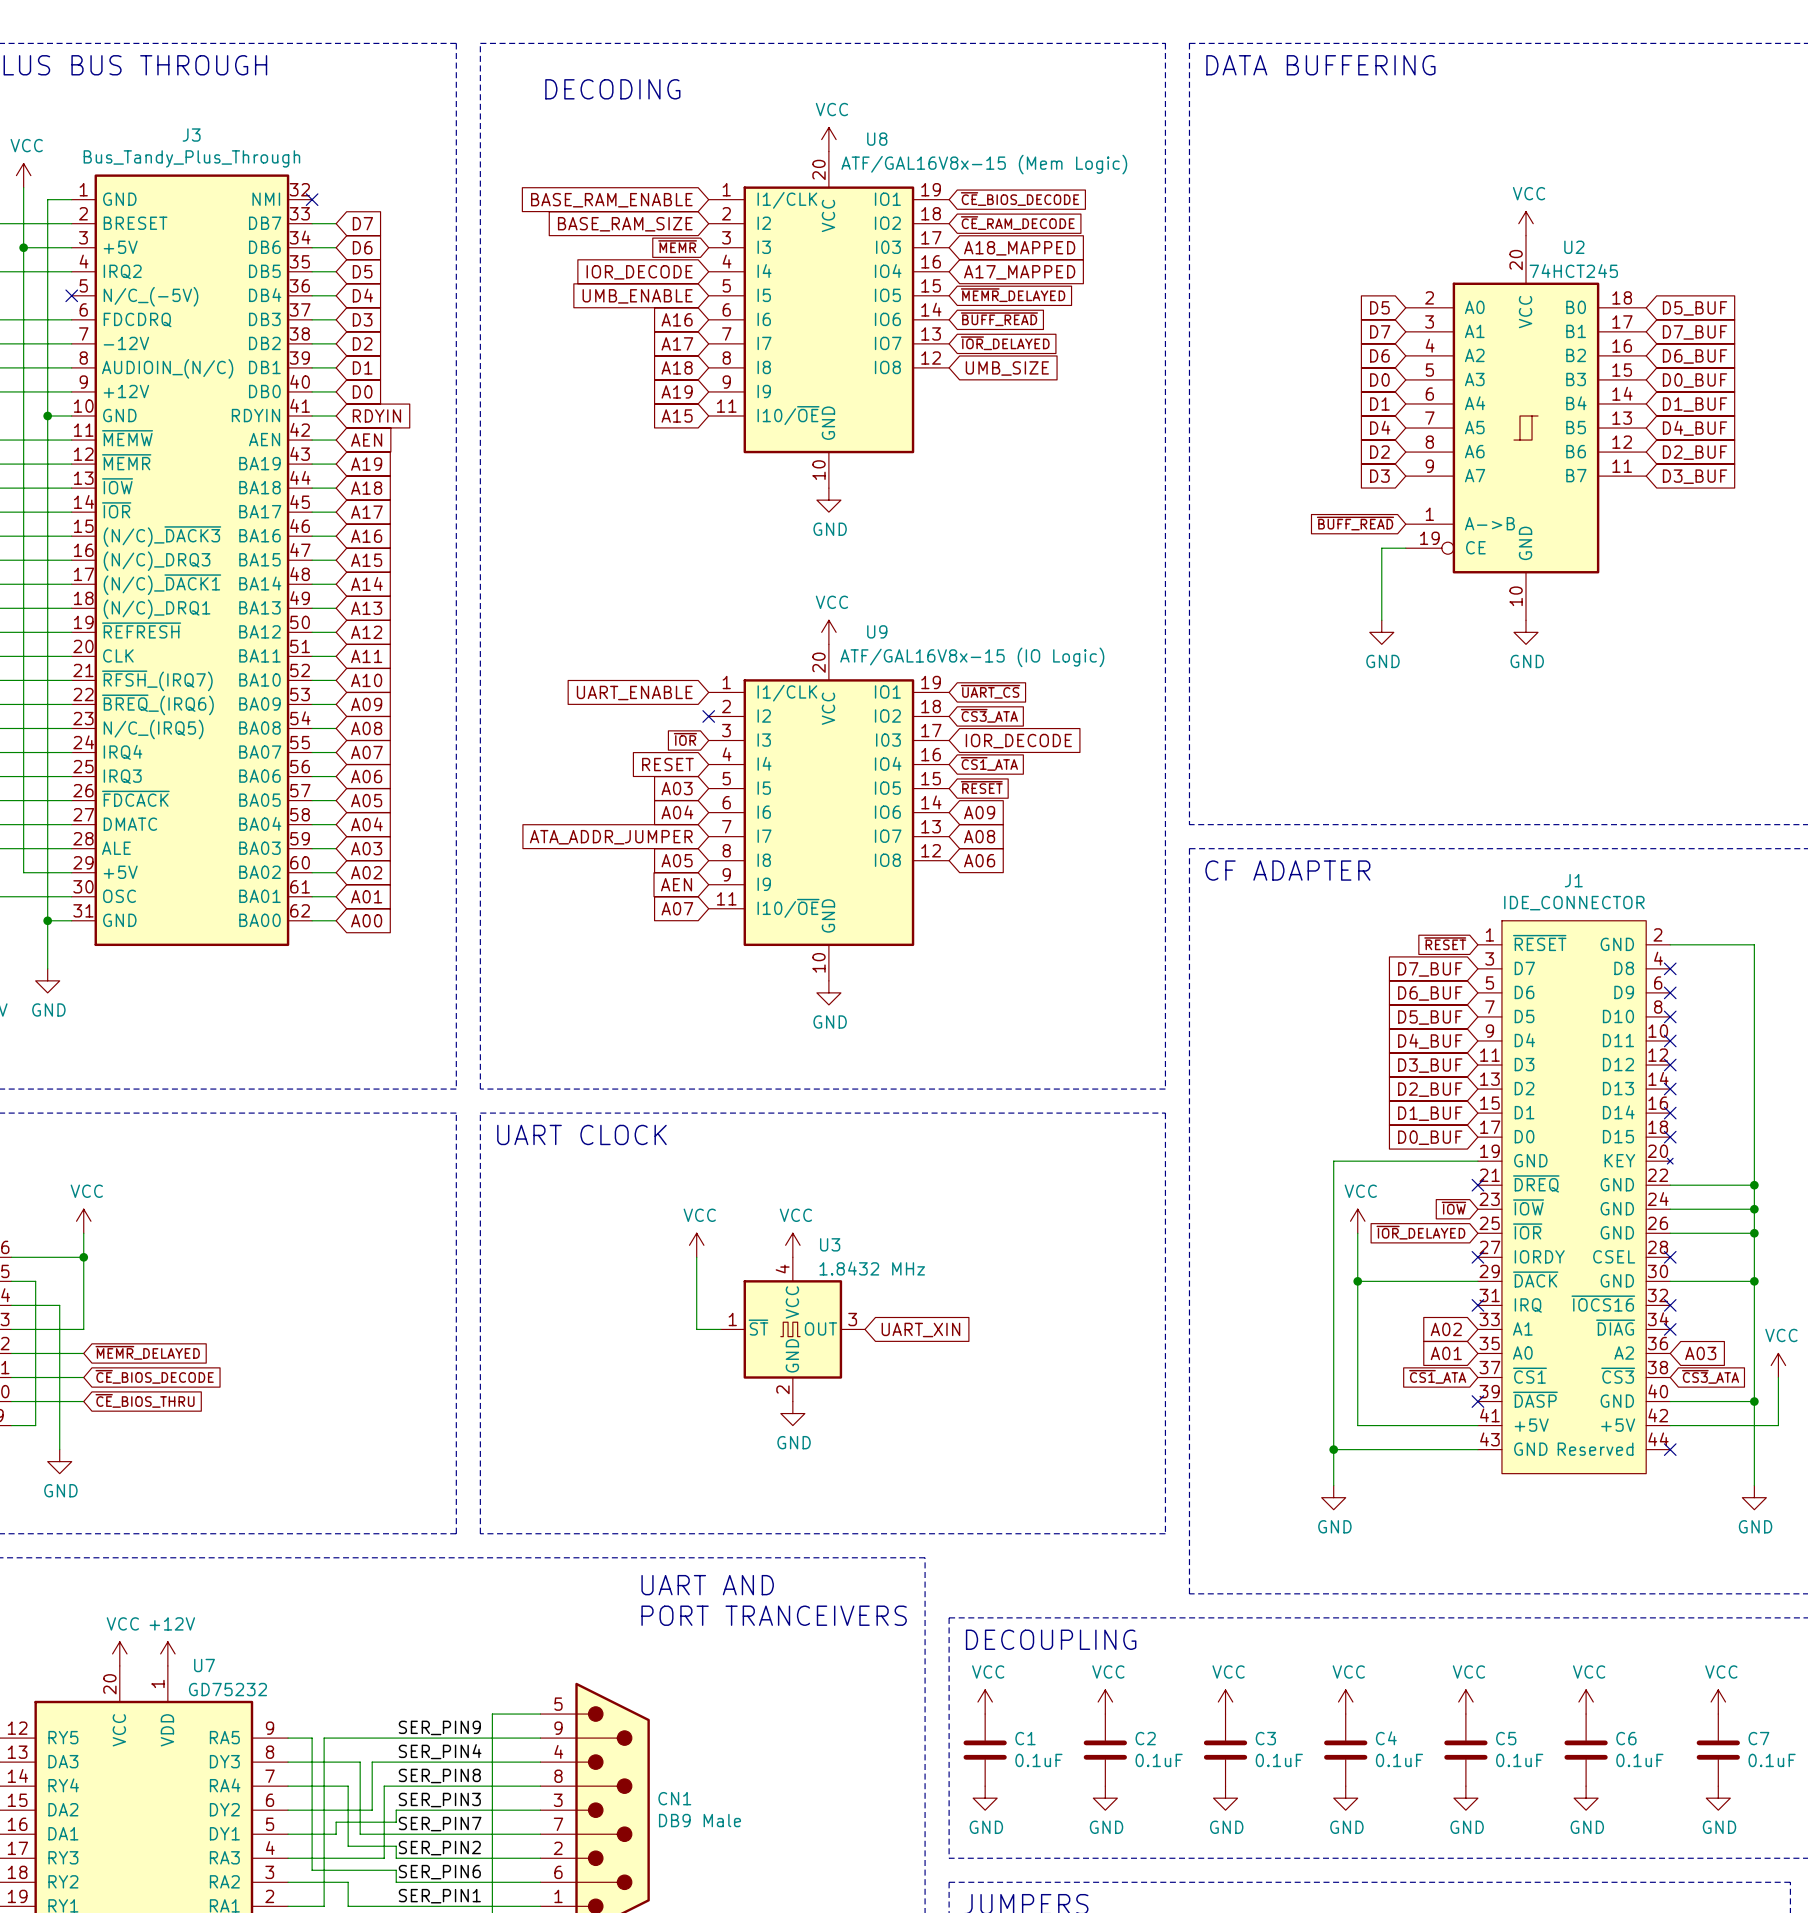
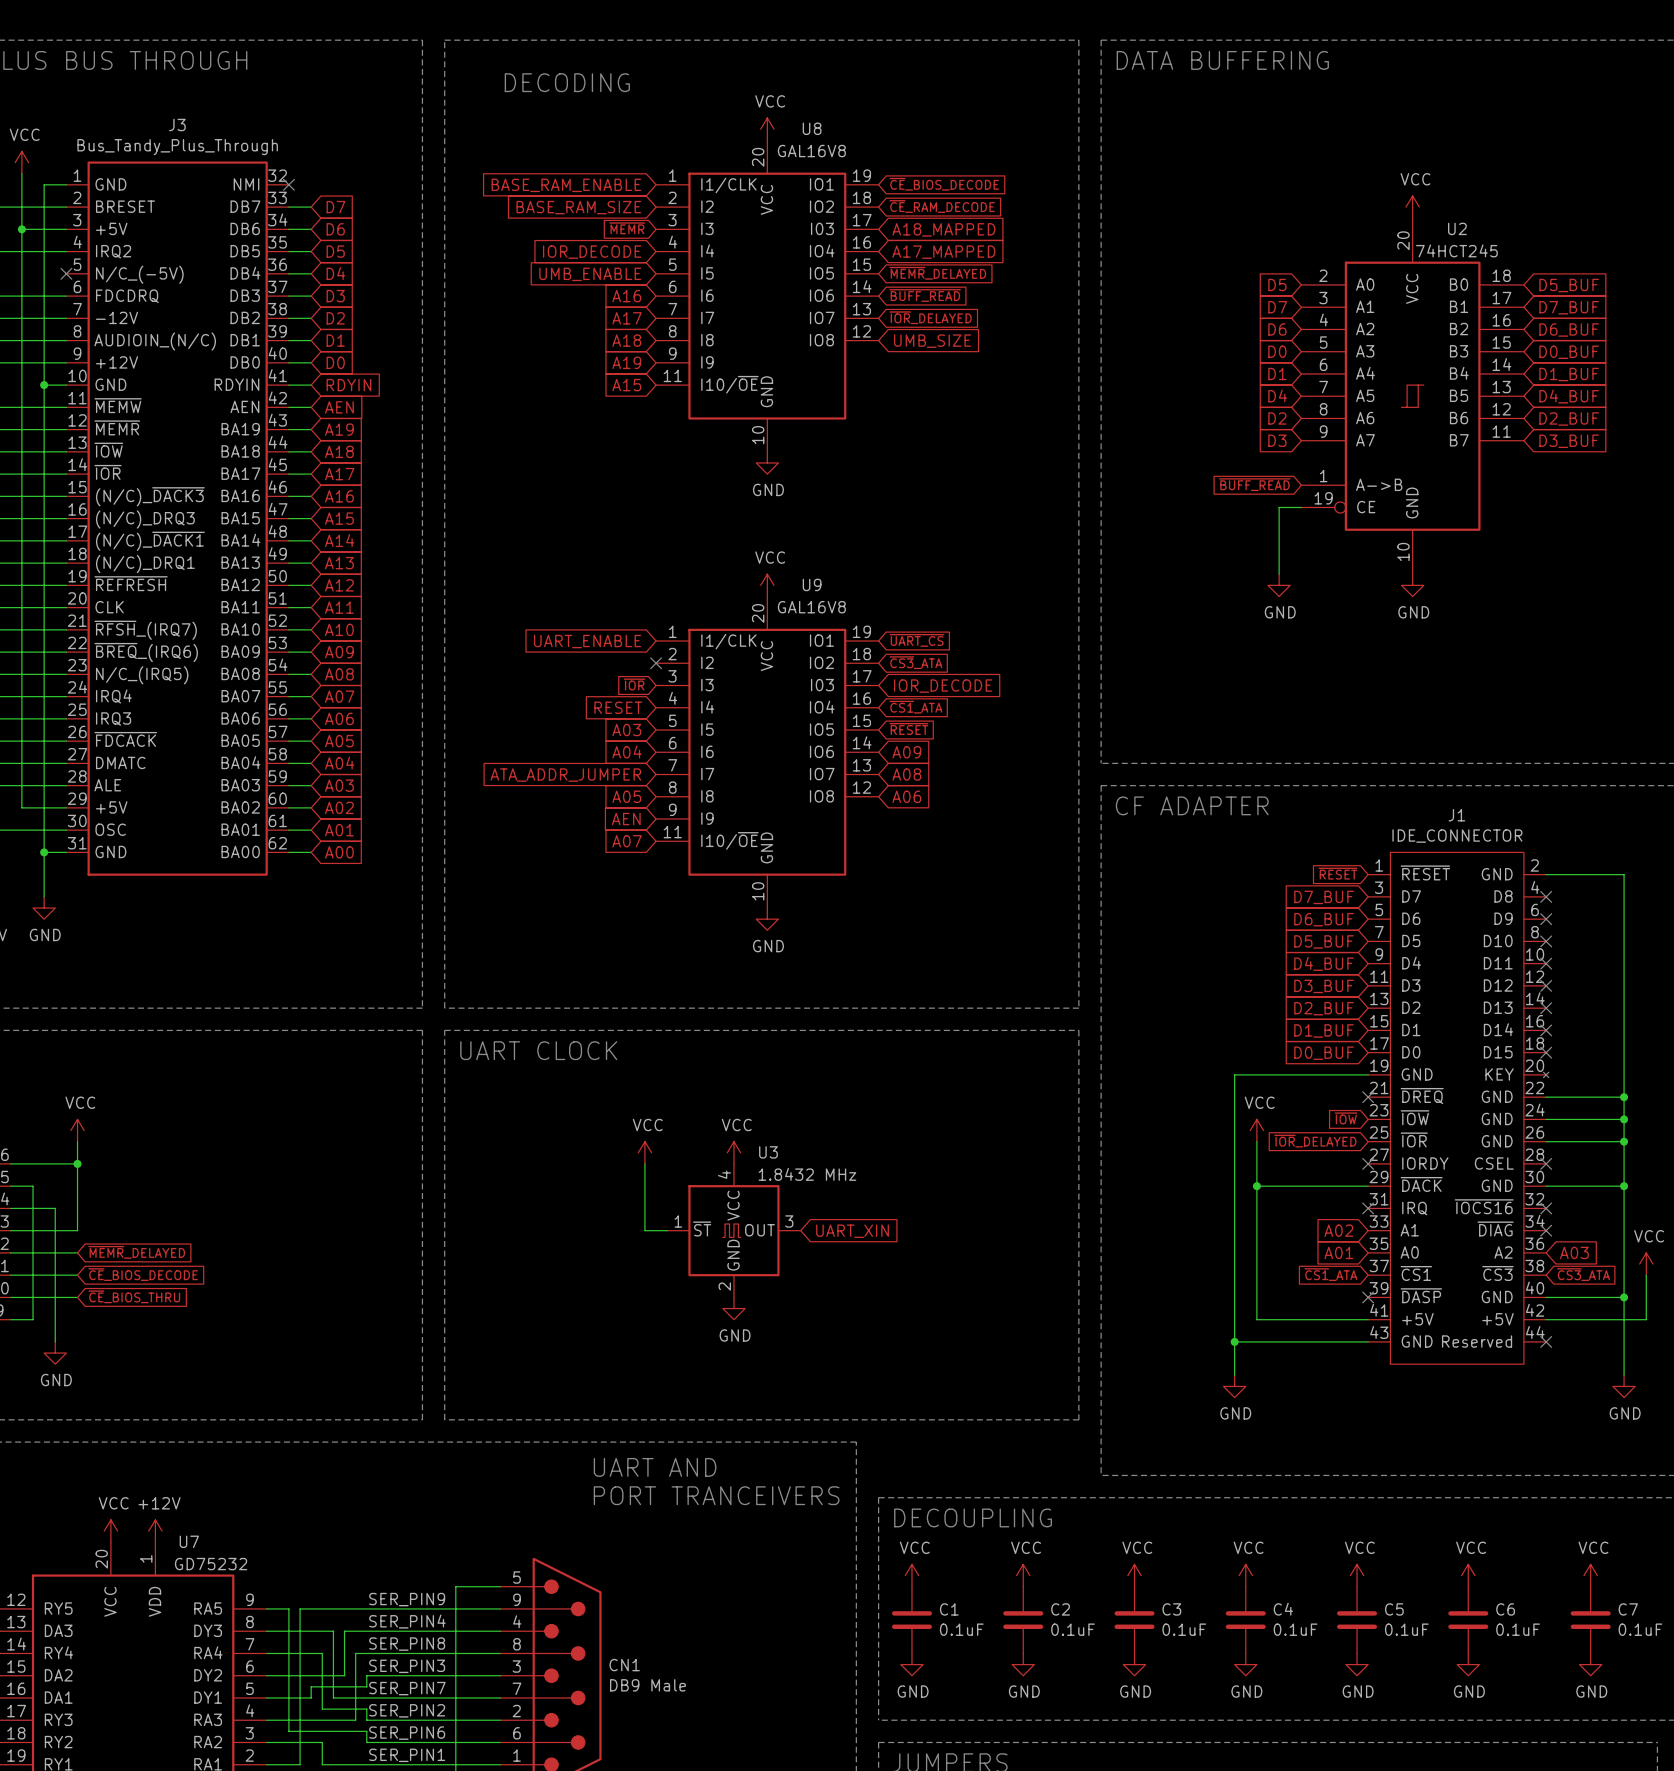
U8 value: ATF/GAL16V8x-15 (Mem Logic) (984, 164) -> GAL16V8 (811, 151)
U9 value: ATF/GAL16V8x-15 (IO Logic) (972, 657) -> GAL16V8 (811, 607)

